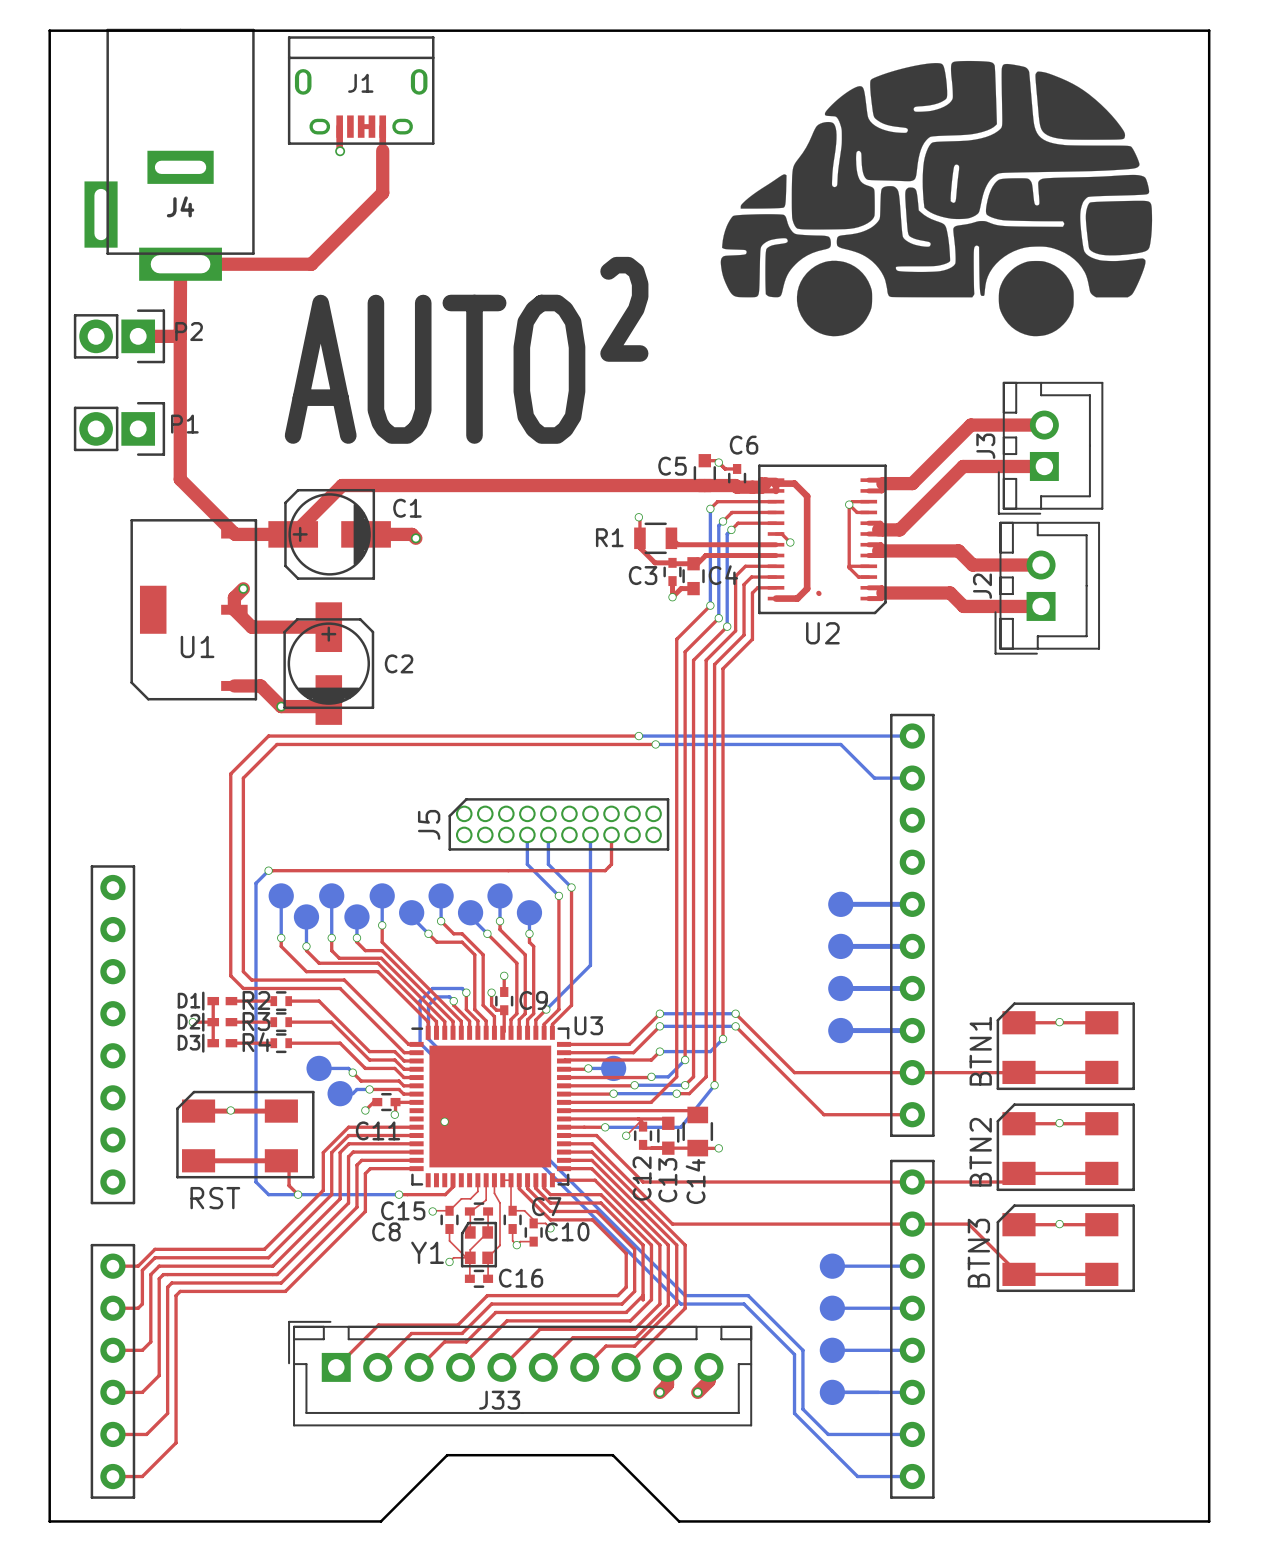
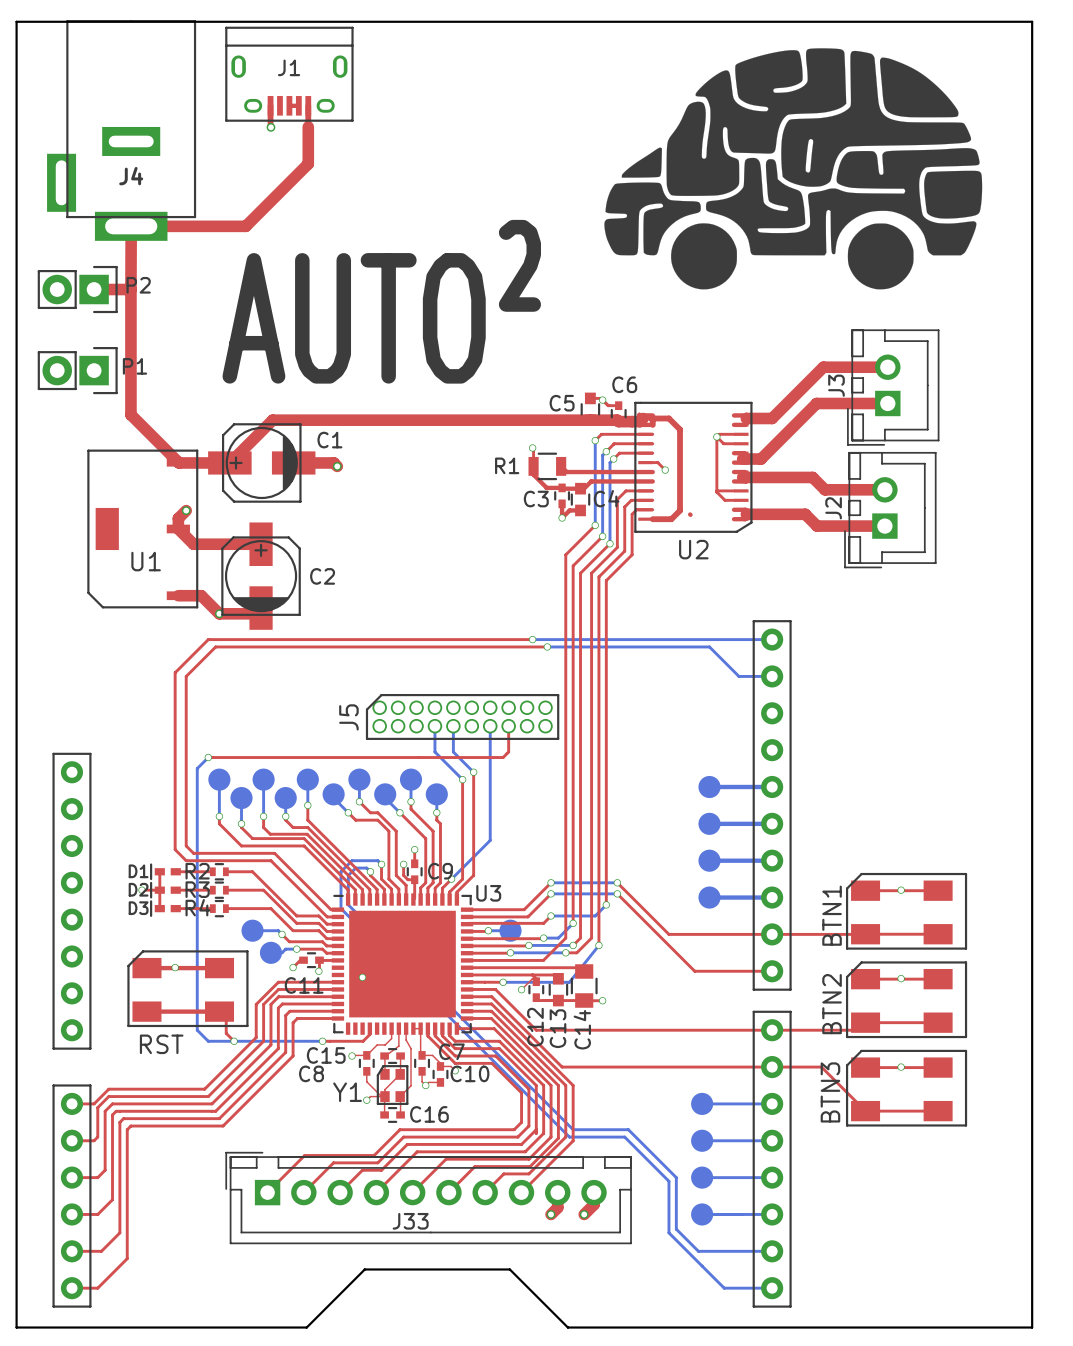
U2 footprint: [758, 464, 887, 615] -> [634, 401, 753, 533]

